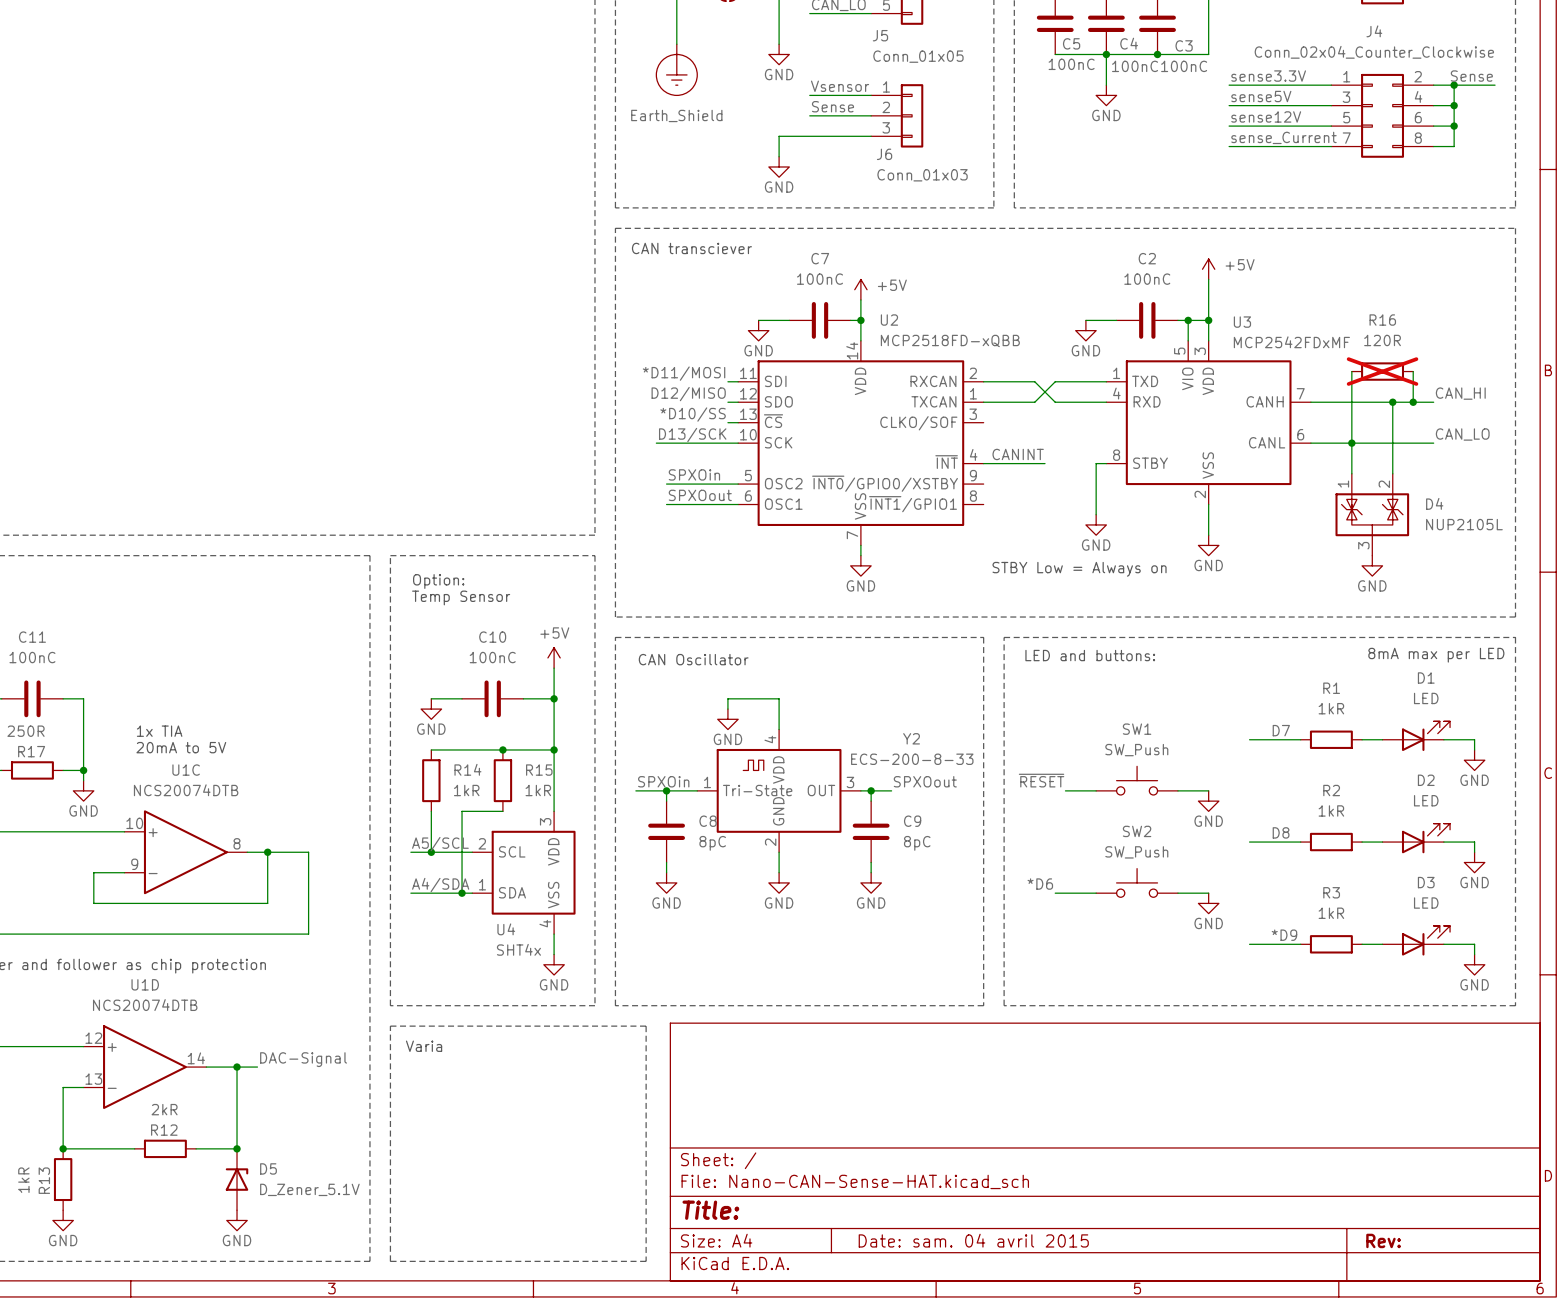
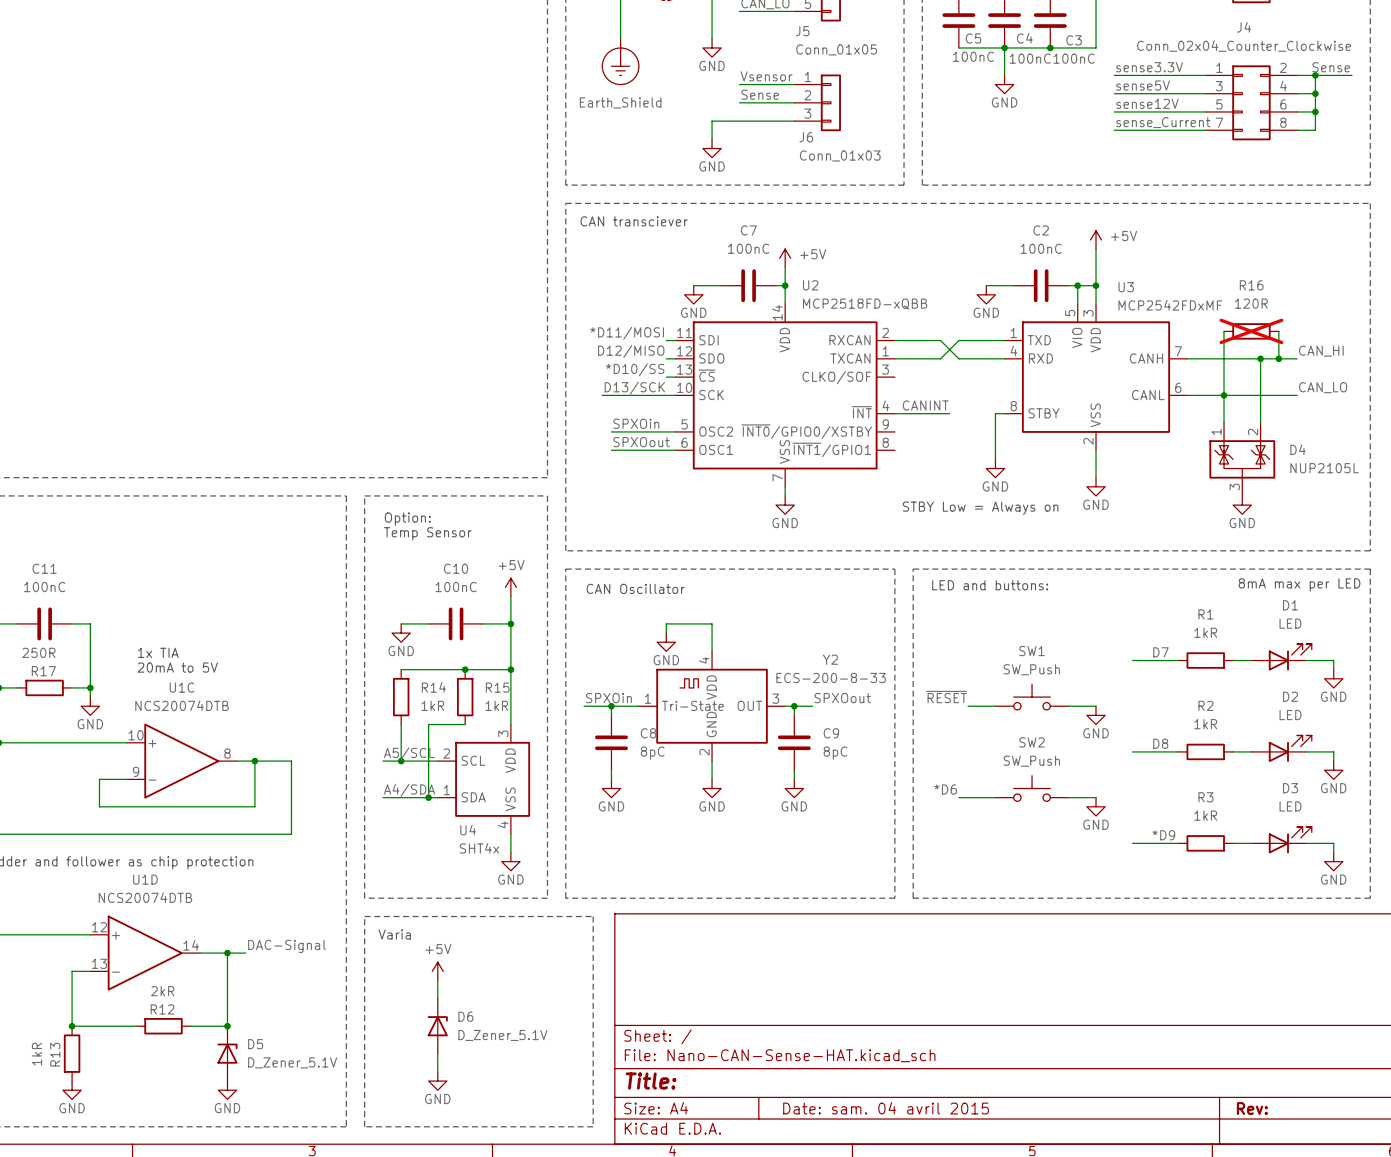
power symbol: none -> +5V (437, 971)
wire: none -> (437, 980) (437, 998)
D6: none -> D_Zener_5.1V (437, 1026)
wire: none -> (437, 1053) (437, 1071)
power symbol: none -> GND (437, 1081)

